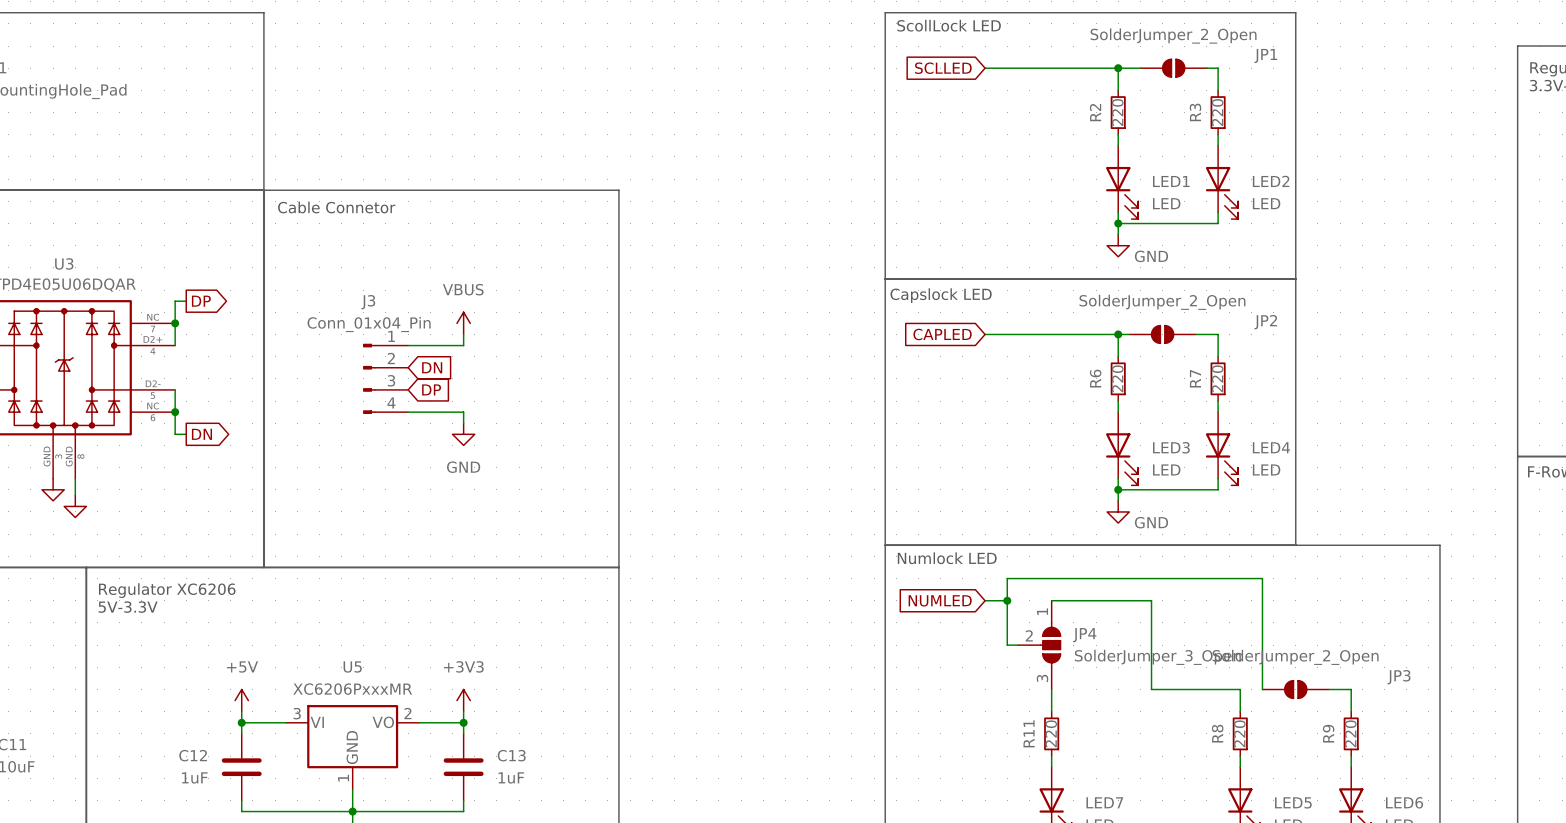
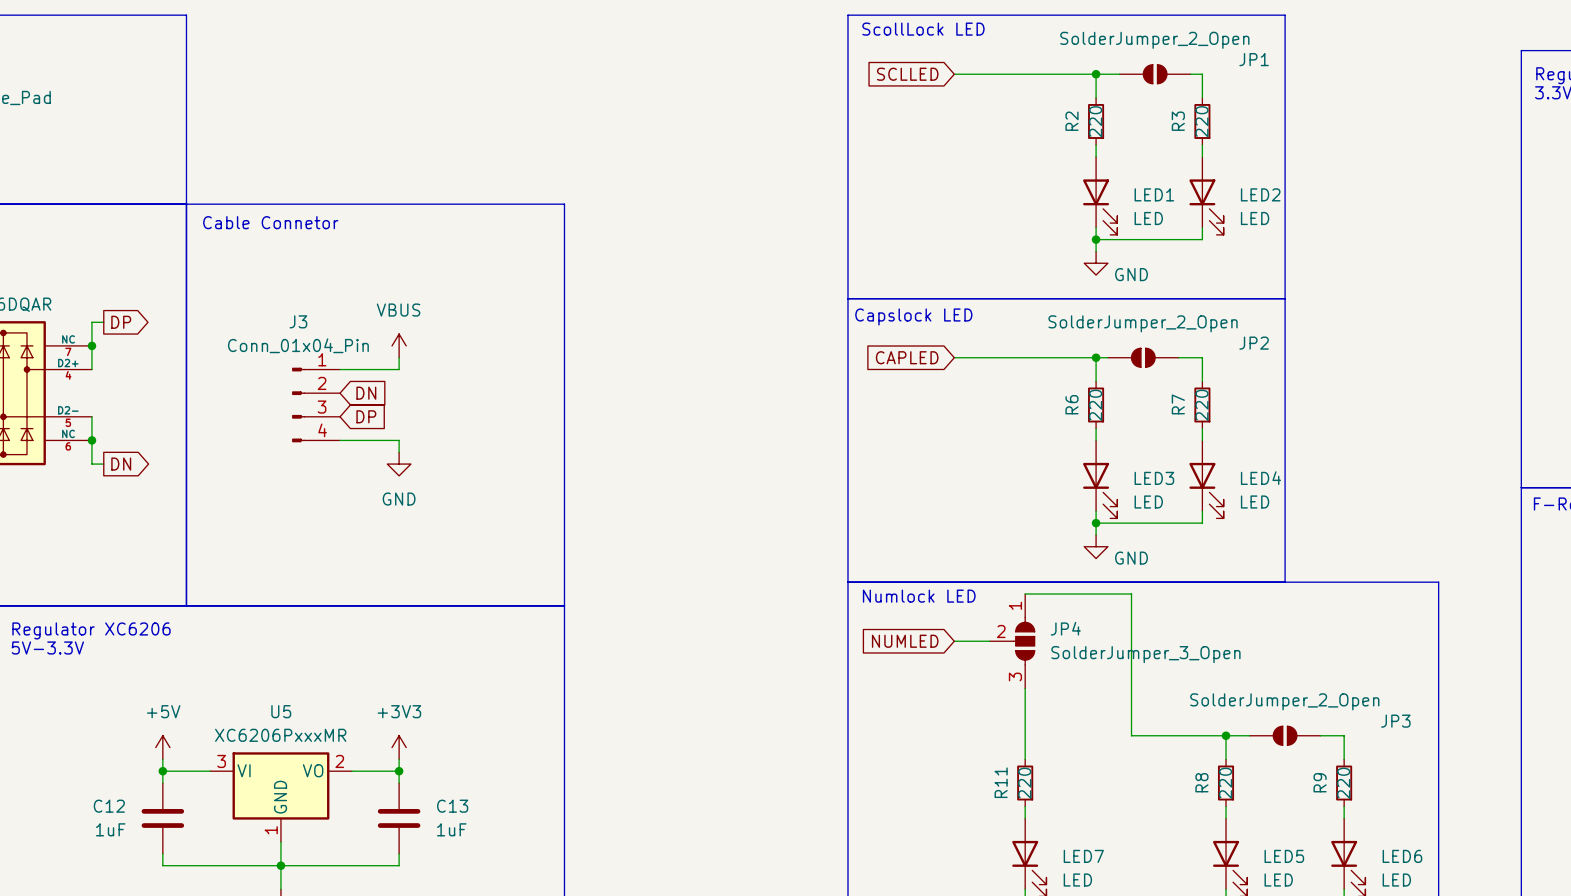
wire: none -> (977, 641) (989, 641)
junction: (1007, 600) -> none
wire: (1051, 600) (1151, 600) -> (1025, 594) (1131, 594) (1131, 641)
wire: (1018, 645) (1007, 645) (1007, 578) (1262, 578) (1262, 689) -> (1226, 735) (1249, 735)
JP4 position: (1039, 645) -> (1012, 641)
junction: none -> (1226, 735)

